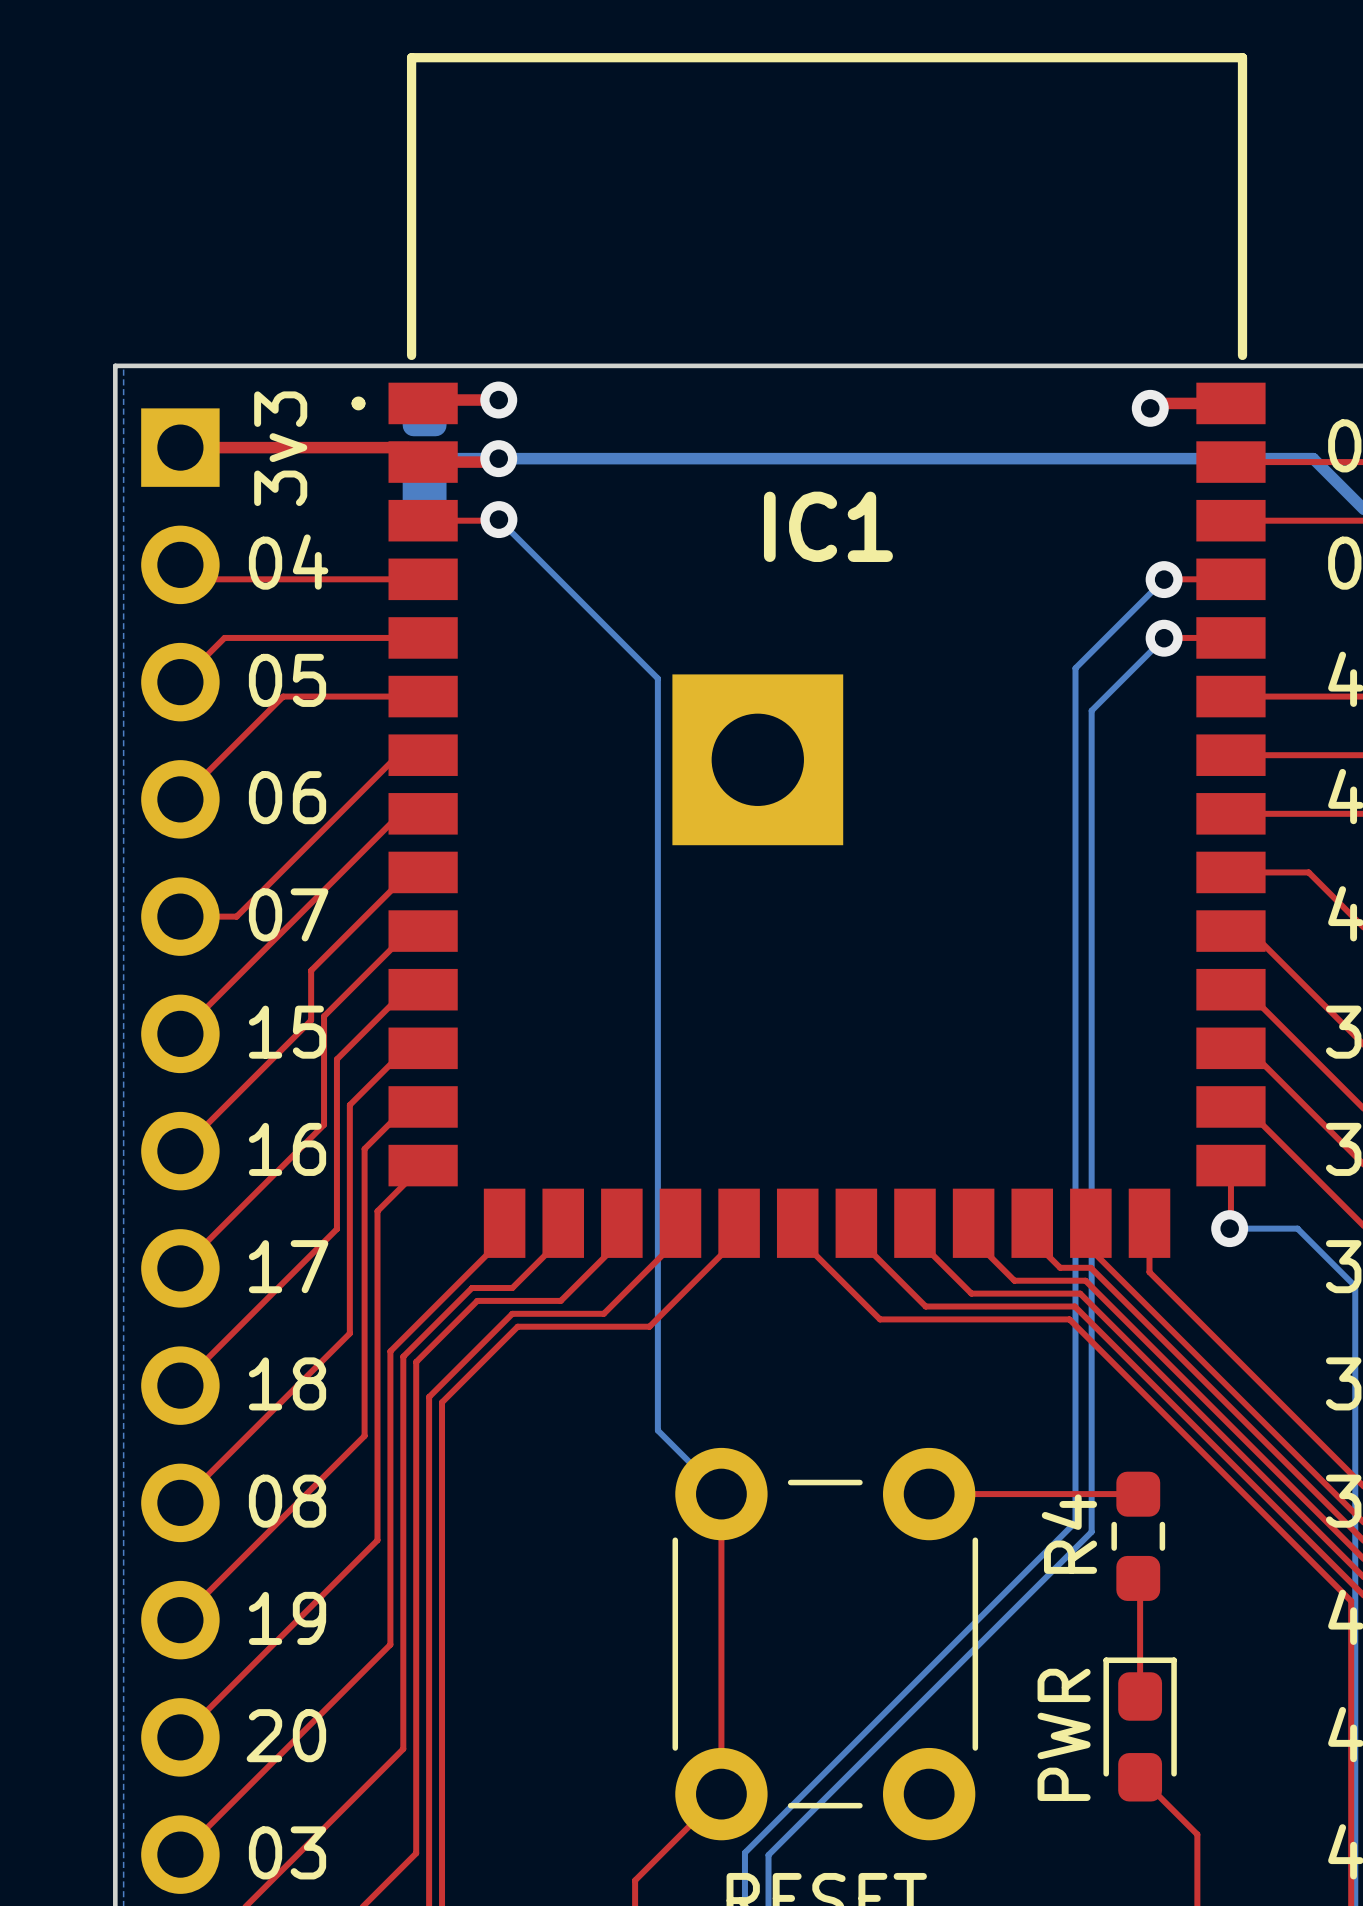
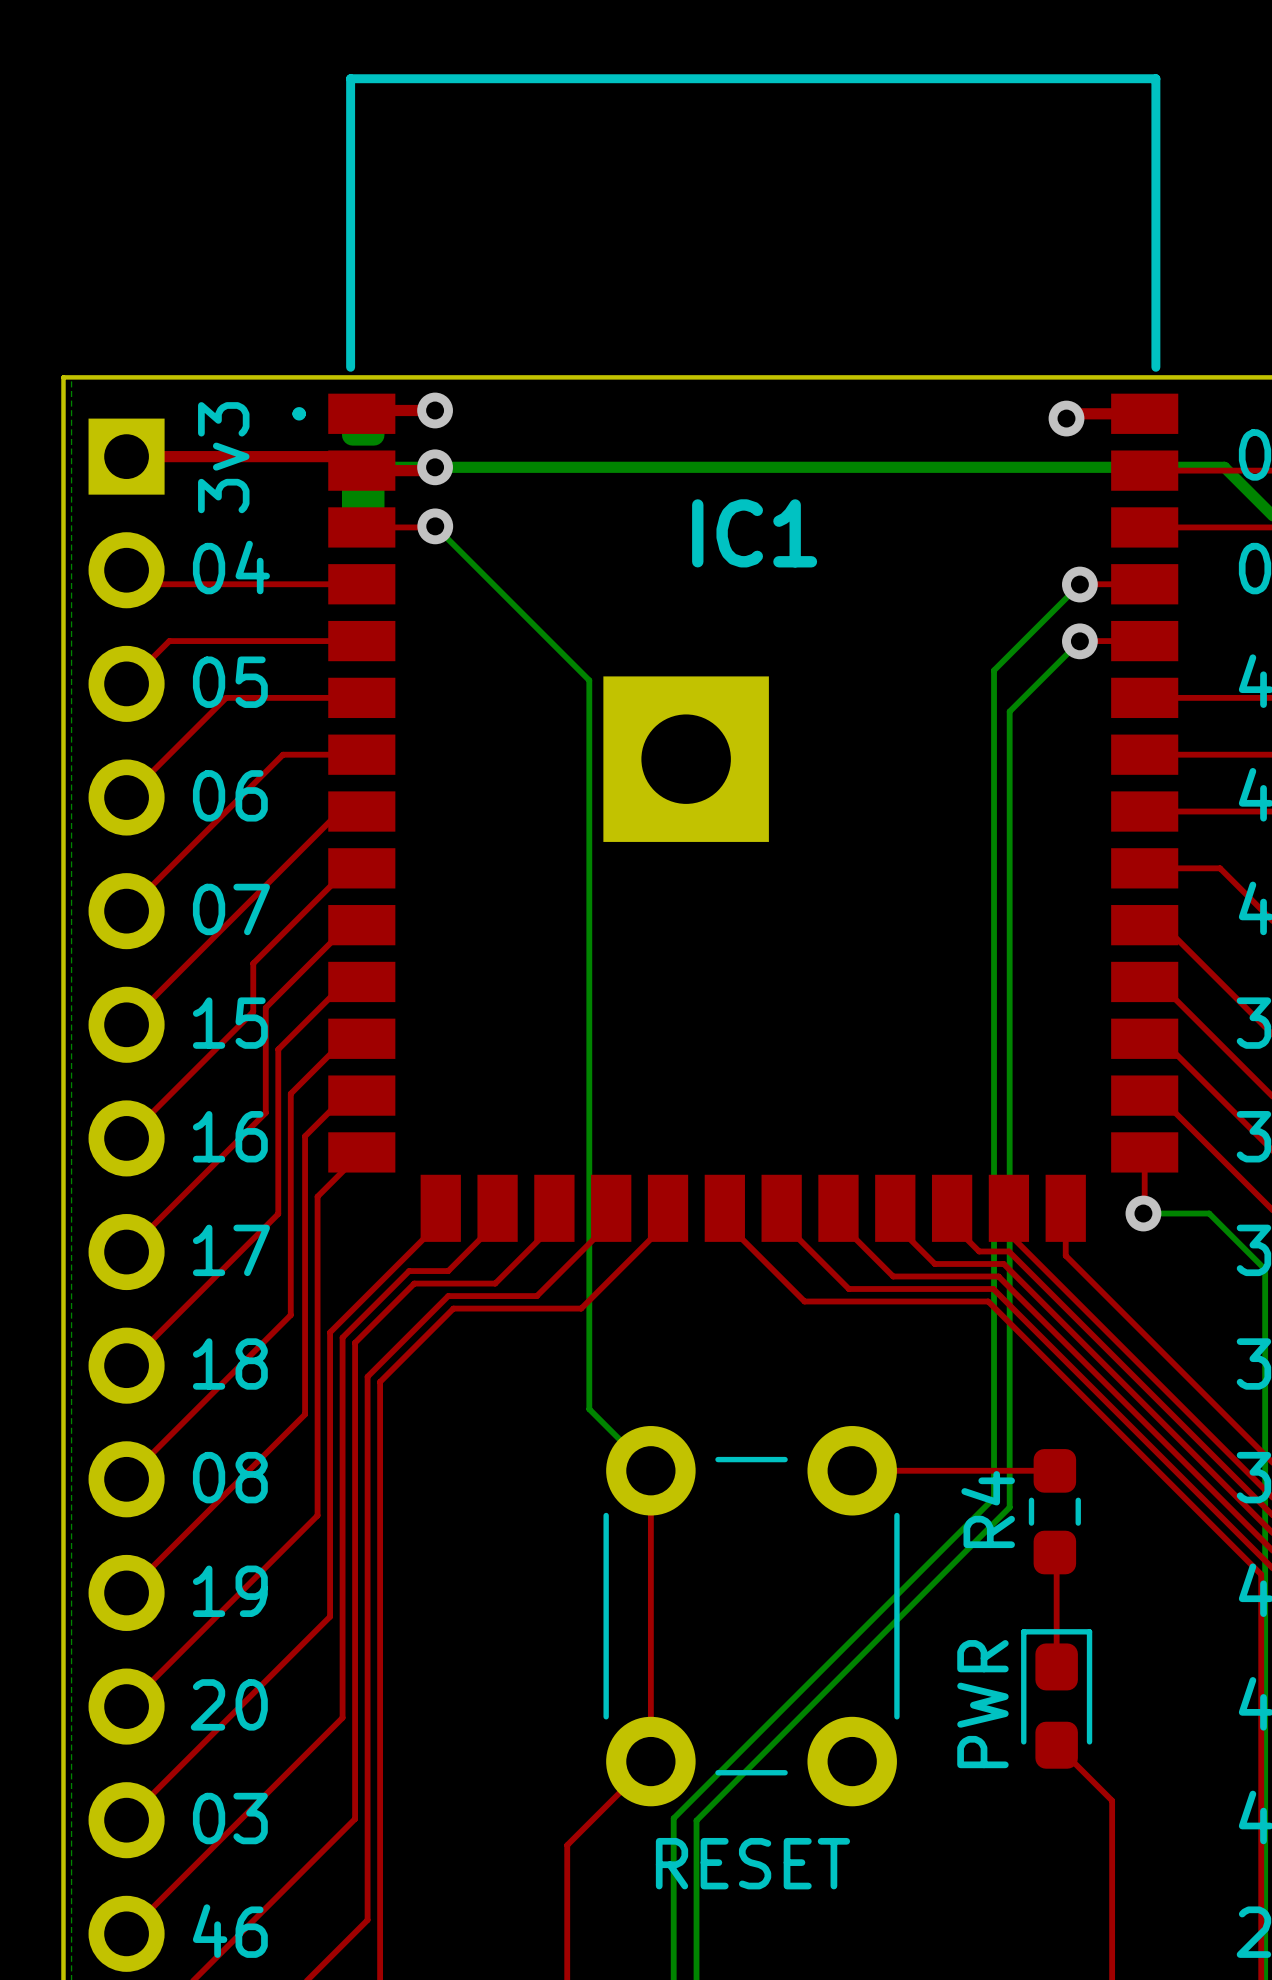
top track: (398, 755) (236, 916) (180, 916) -> (337, 754) (283, 754) (126, 911)

